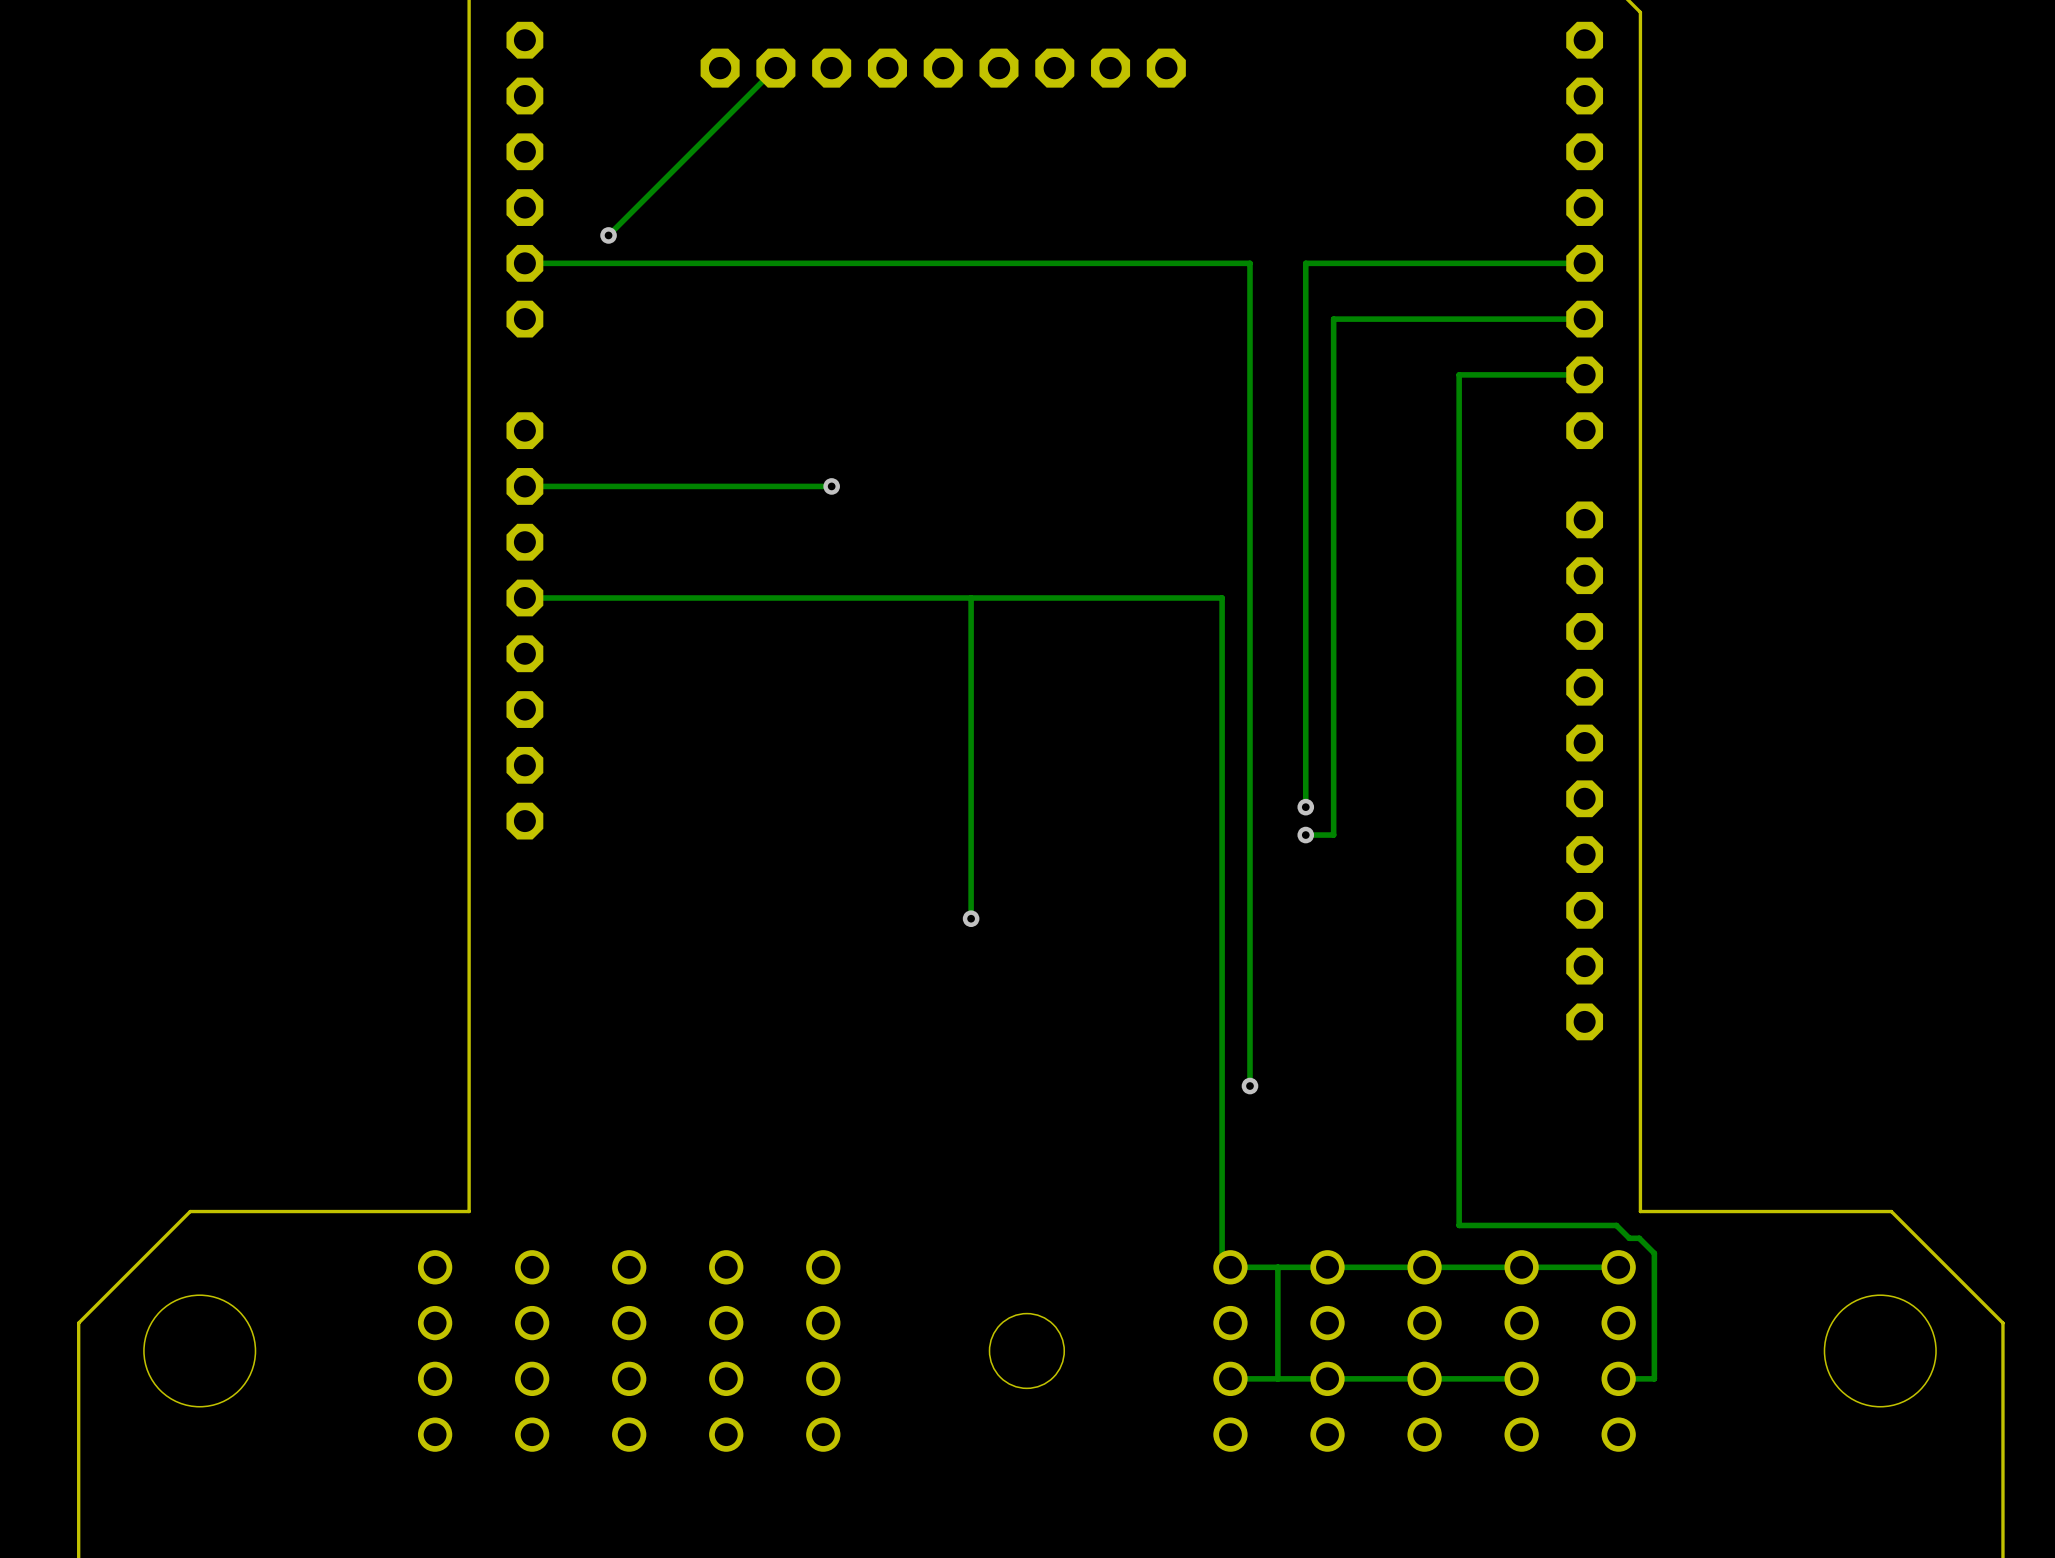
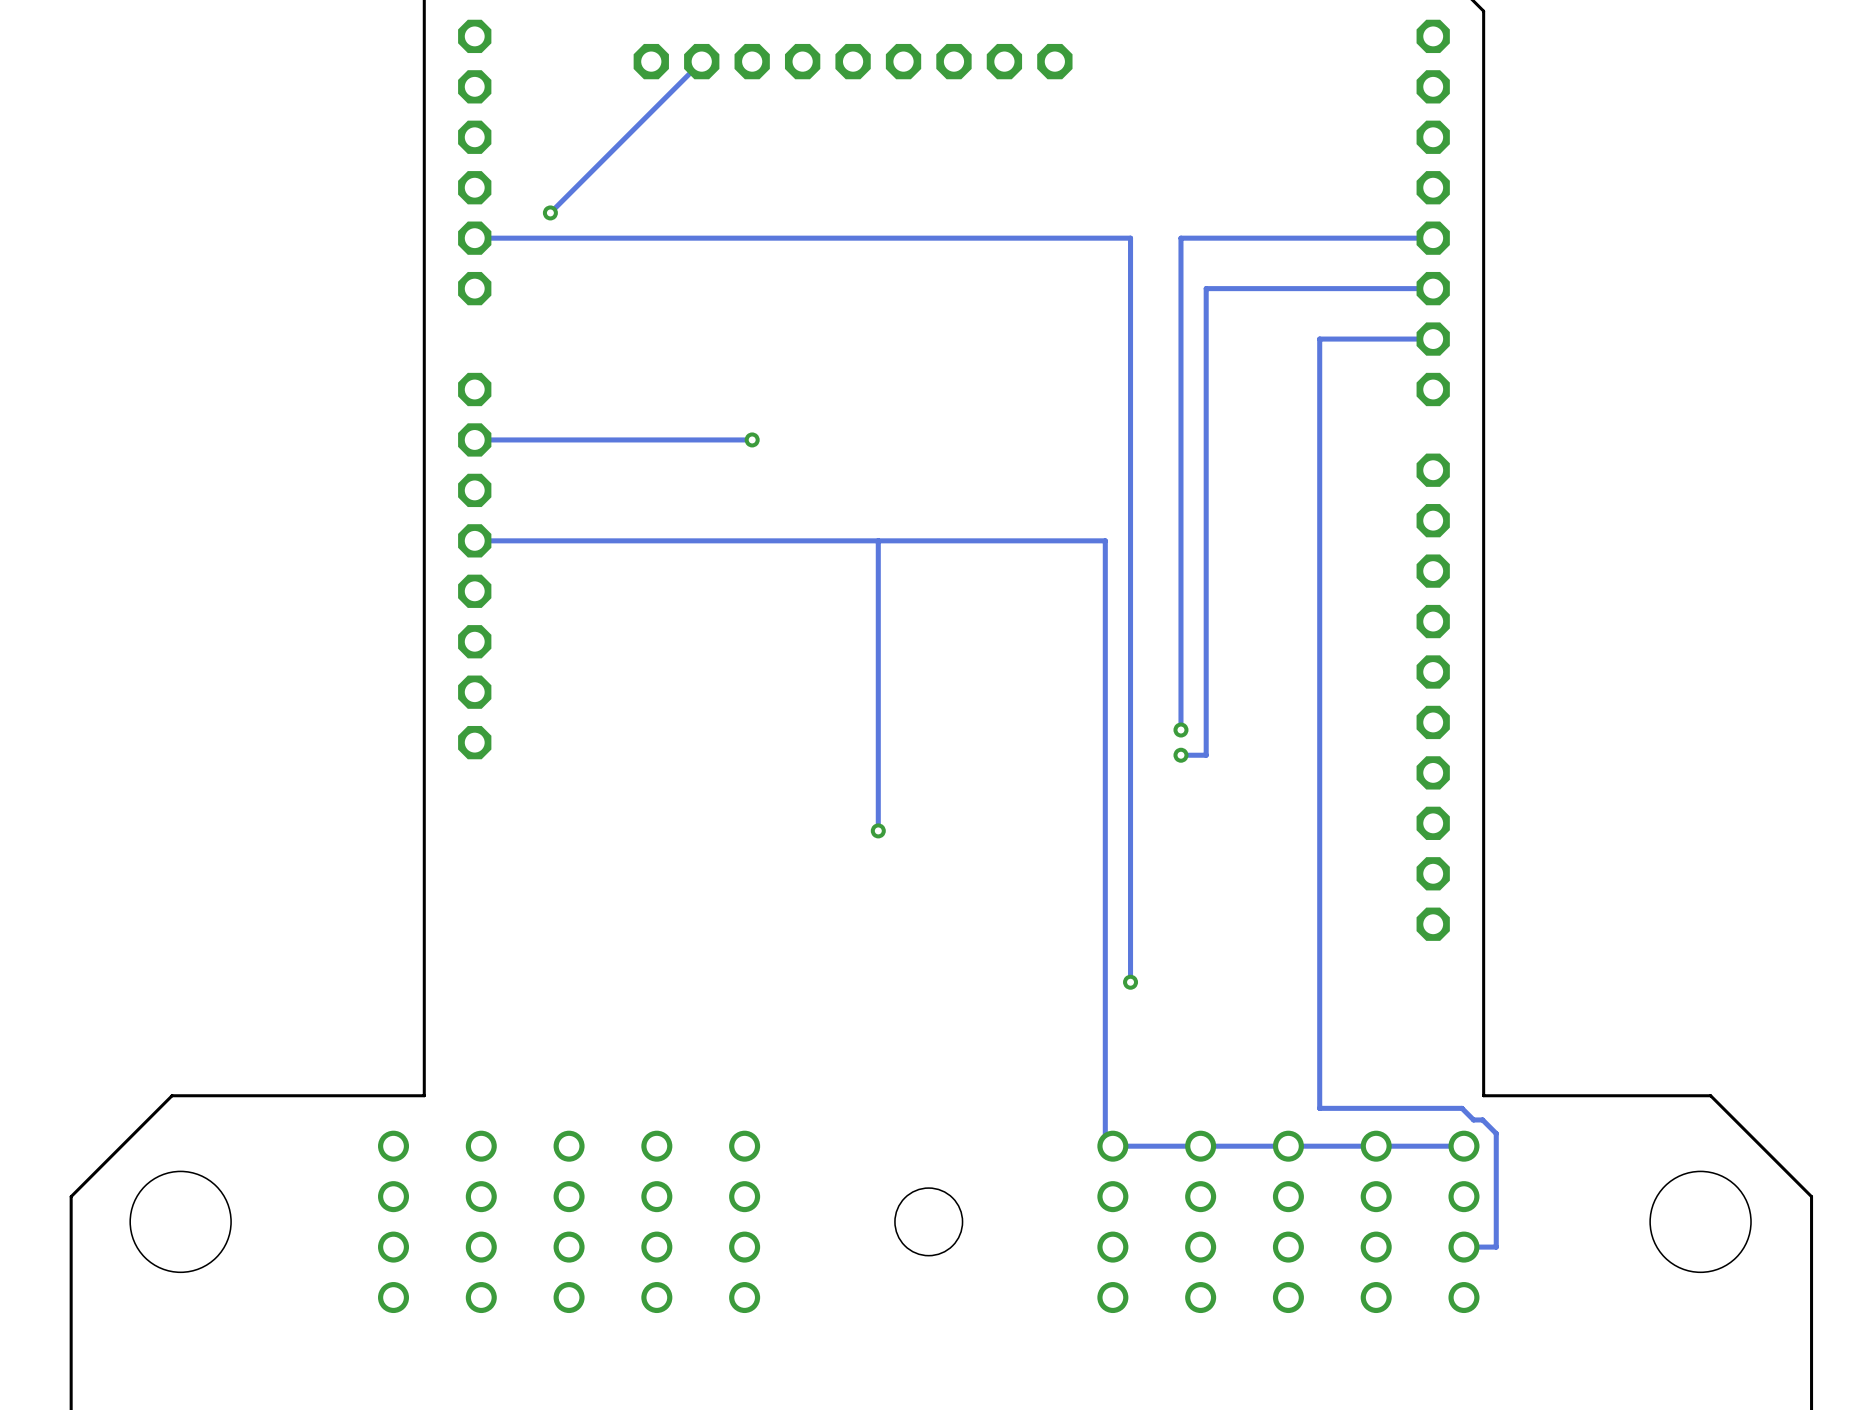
track: (1277, 1267) (1277, 1378) -> none
track: (1521, 1378) (1230, 1378) -> none

